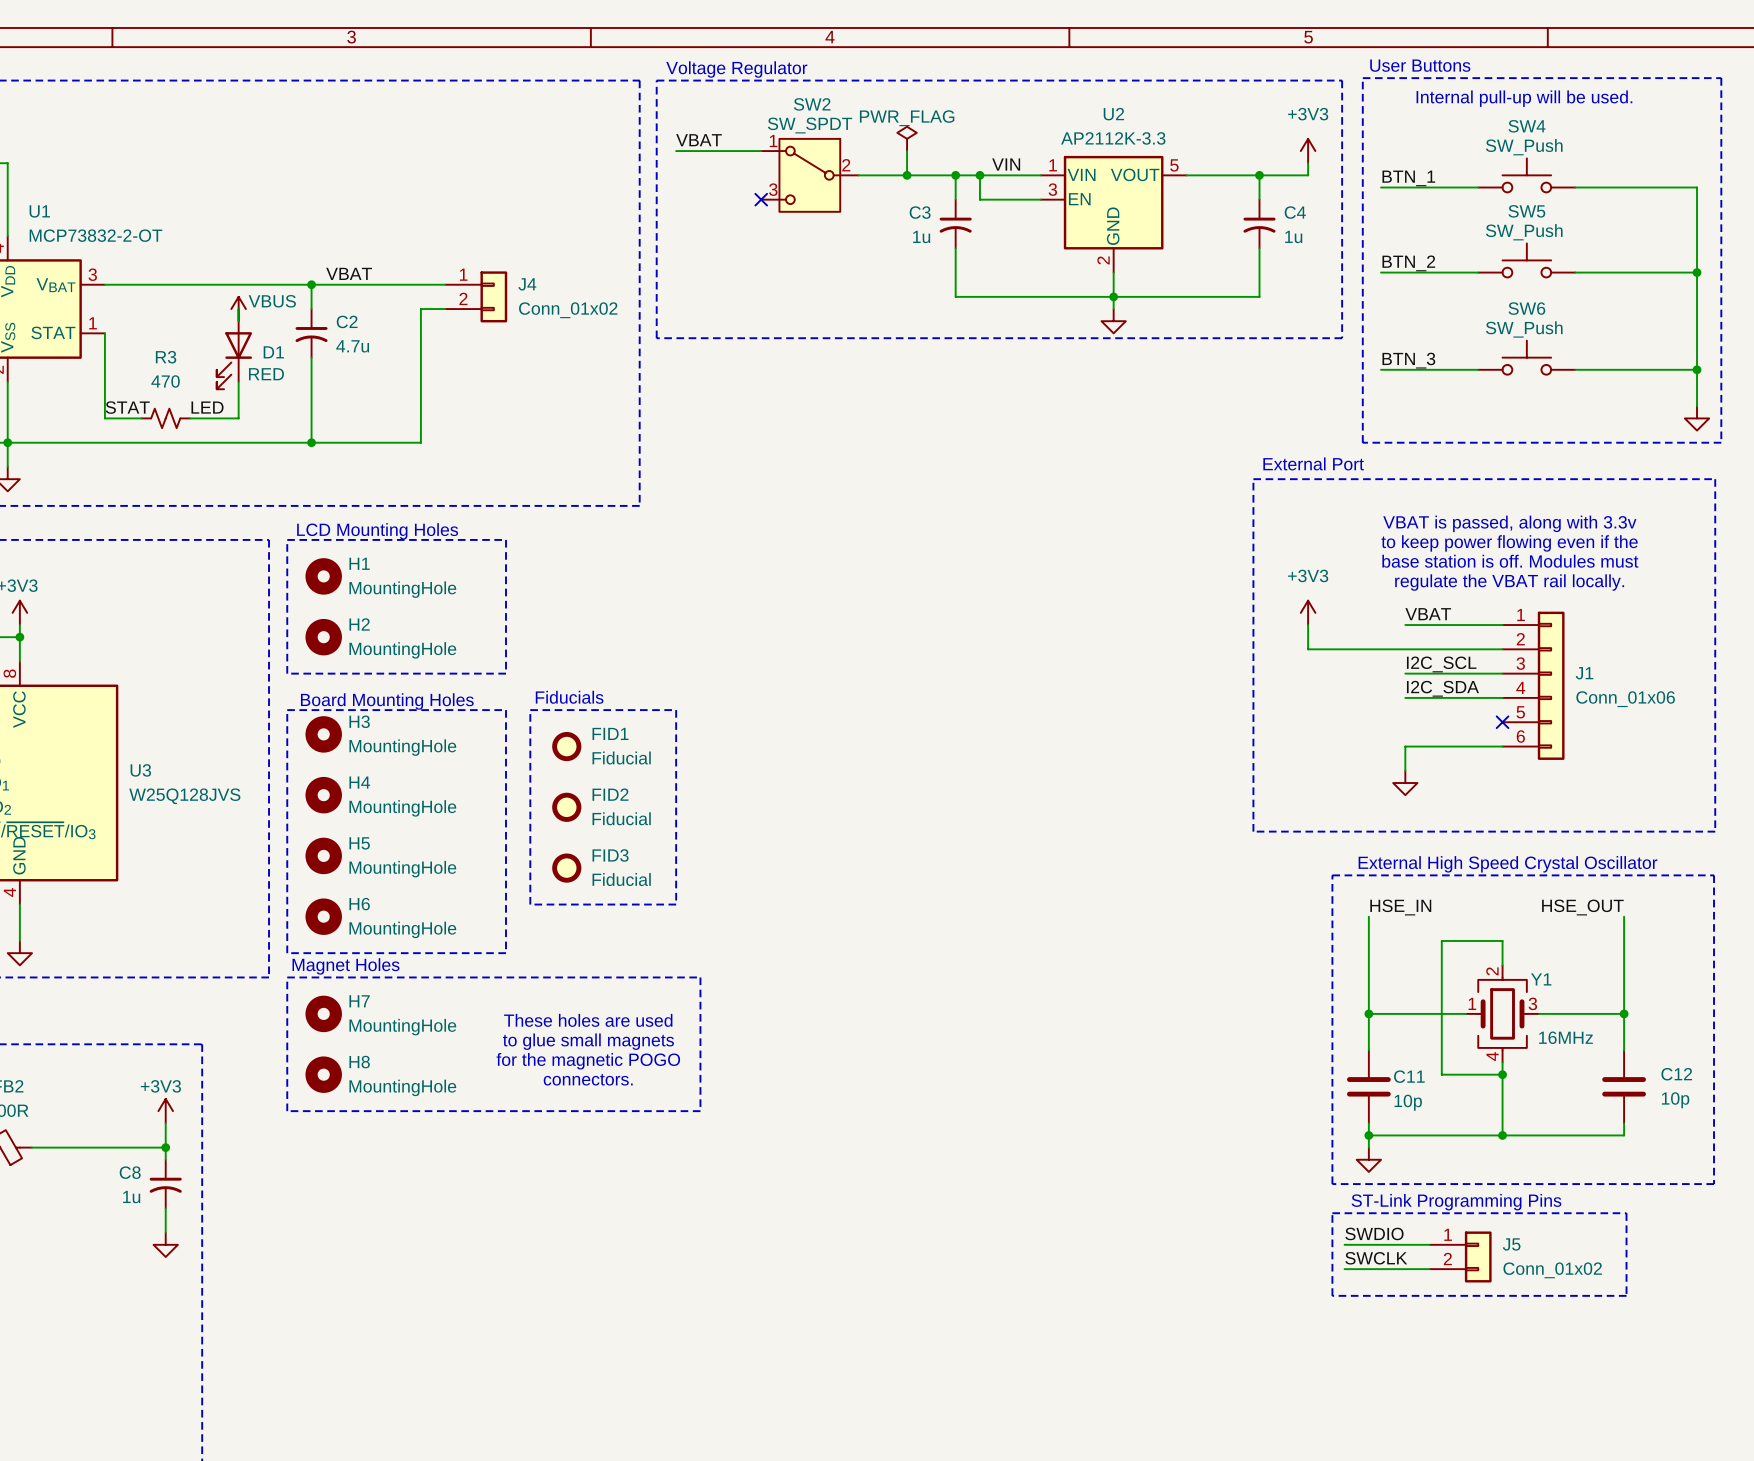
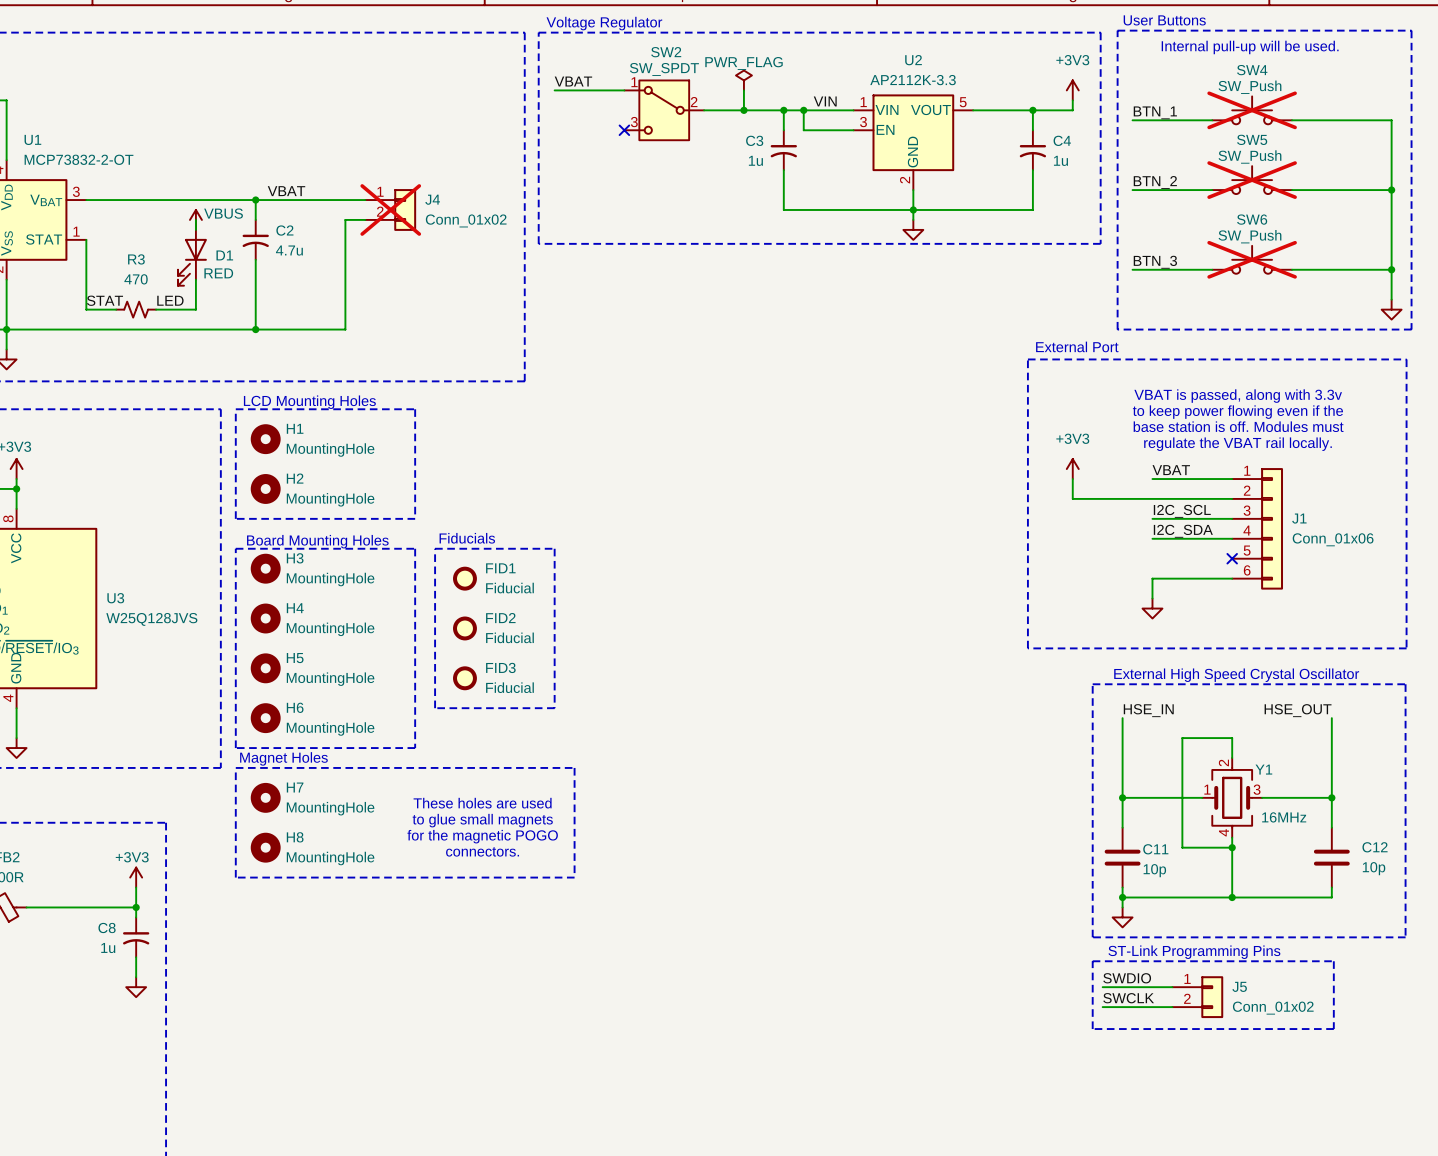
SW4 do-not-place cross: none -> (1252, 110)
SW5 do-not-place cross: none -> (1252, 180)
J4 do-not-place cross: none -> (390, 209)
SW6 do-not-place cross: none -> (1252, 259)

